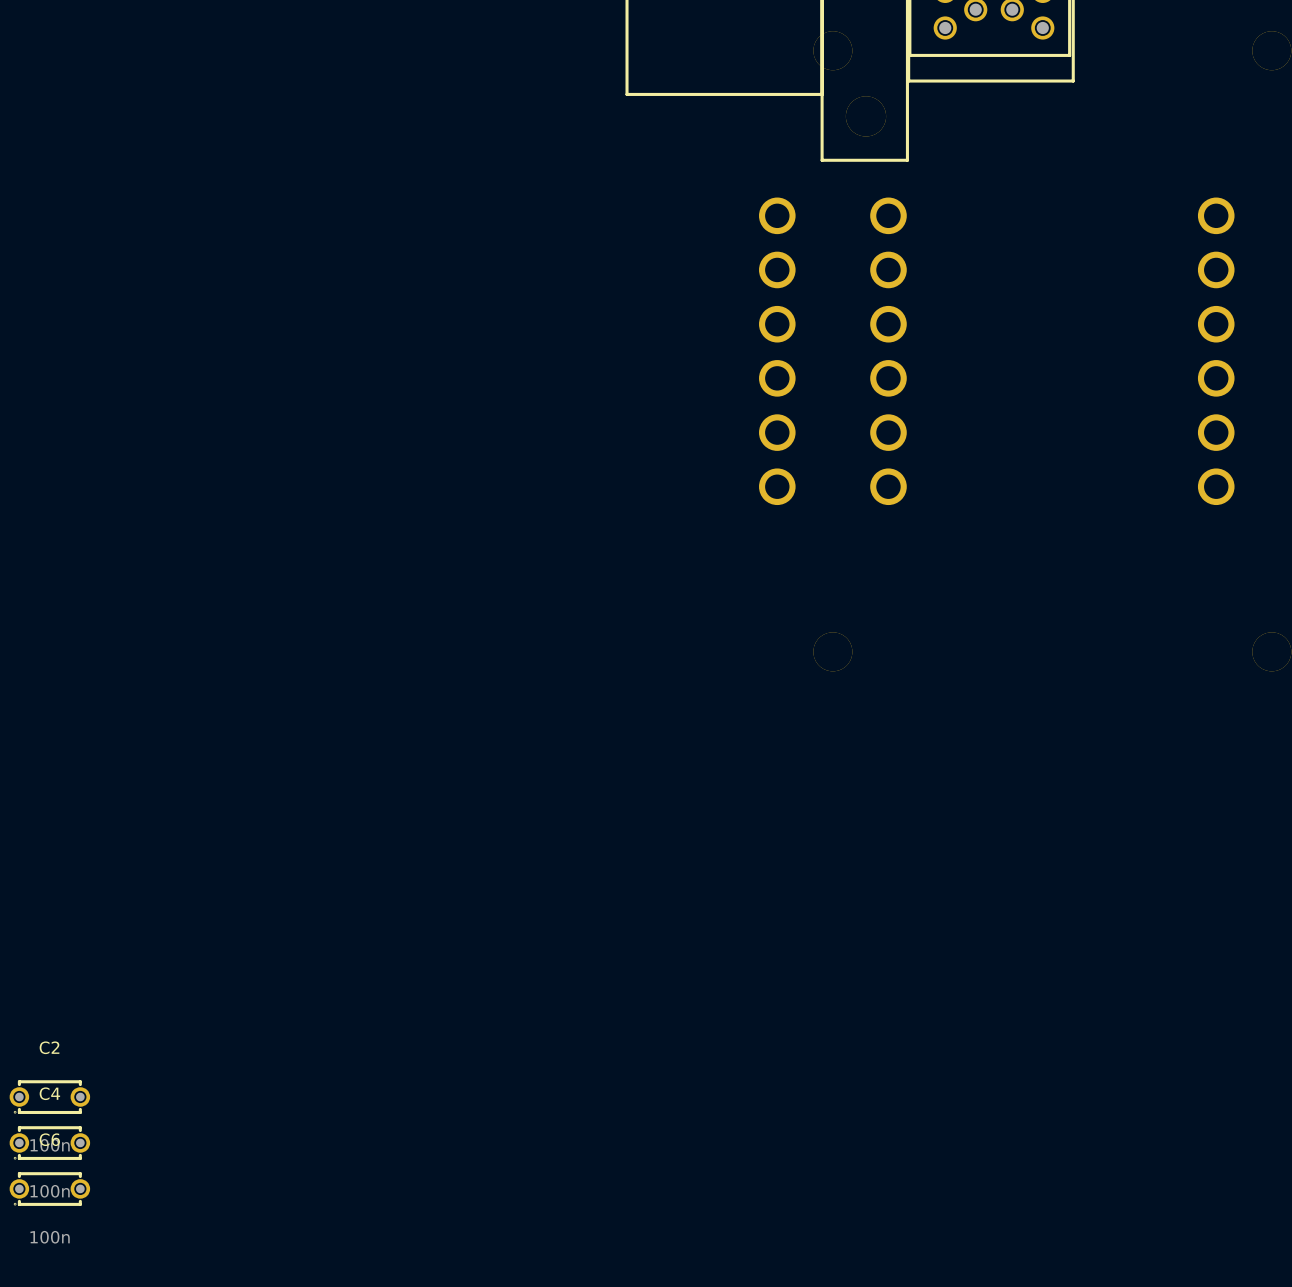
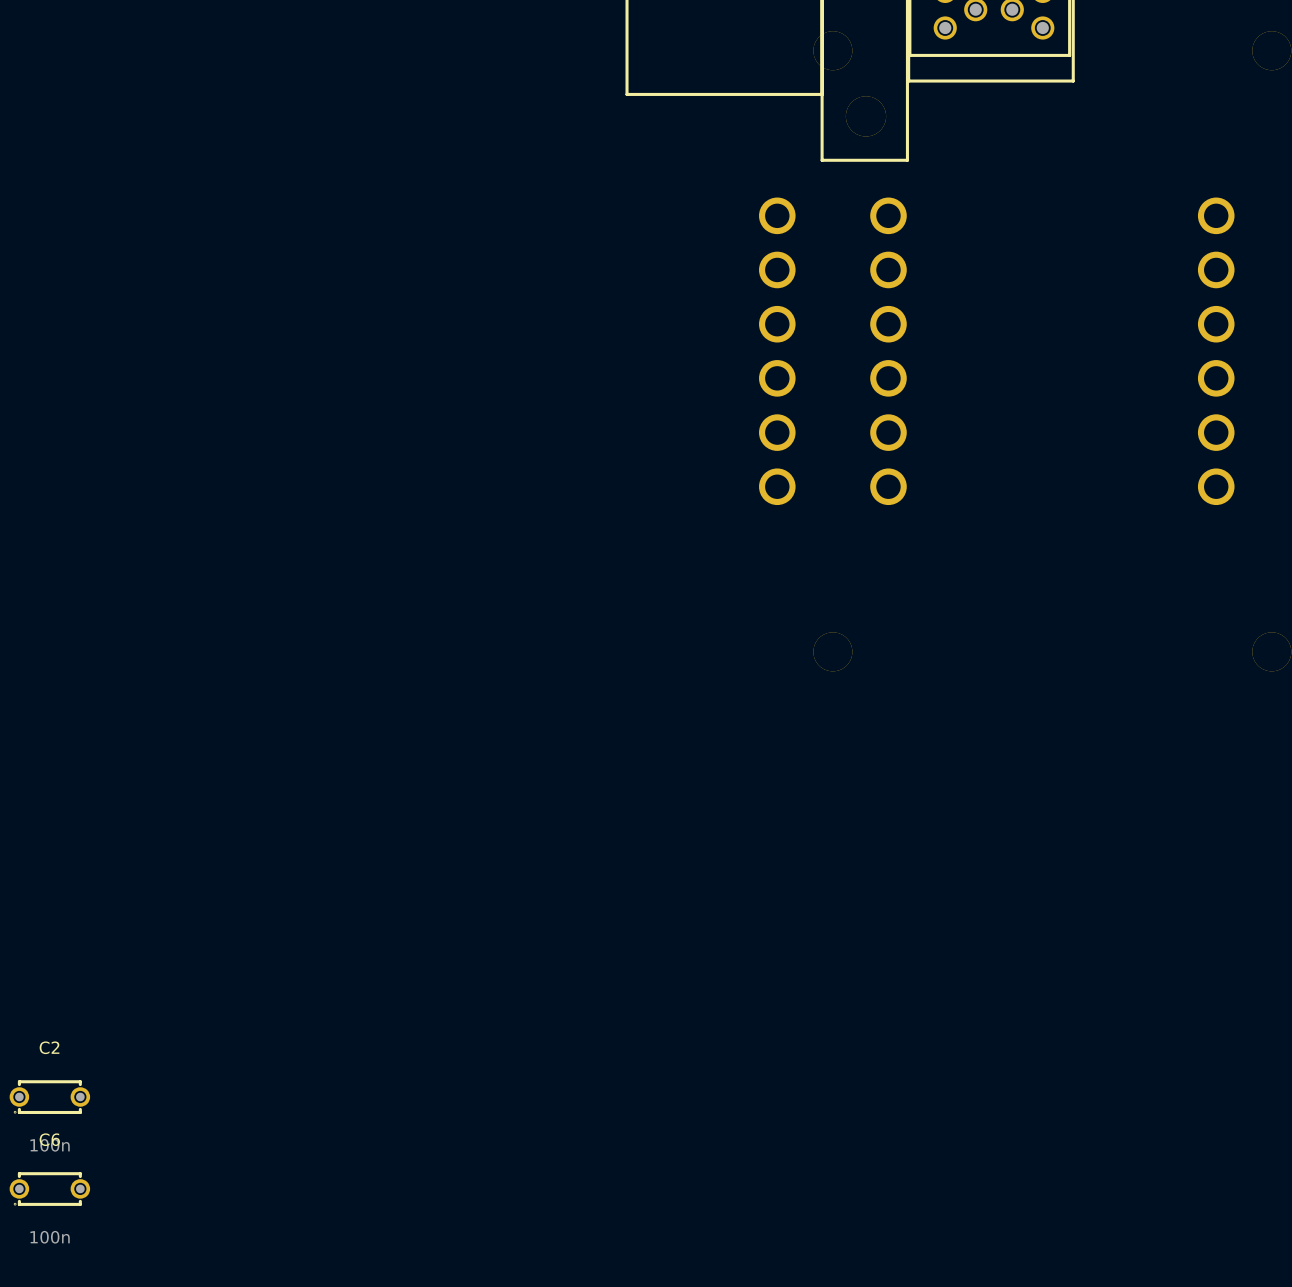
C4: 100n (49, 1143) -> none

